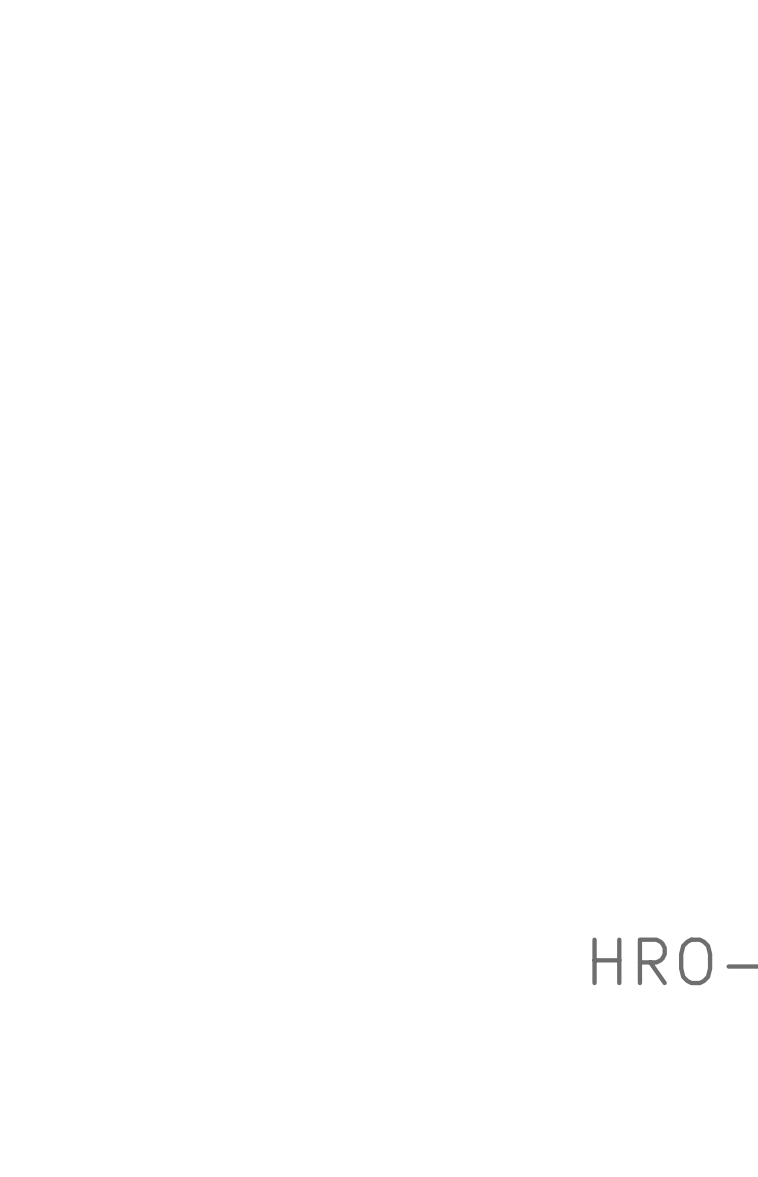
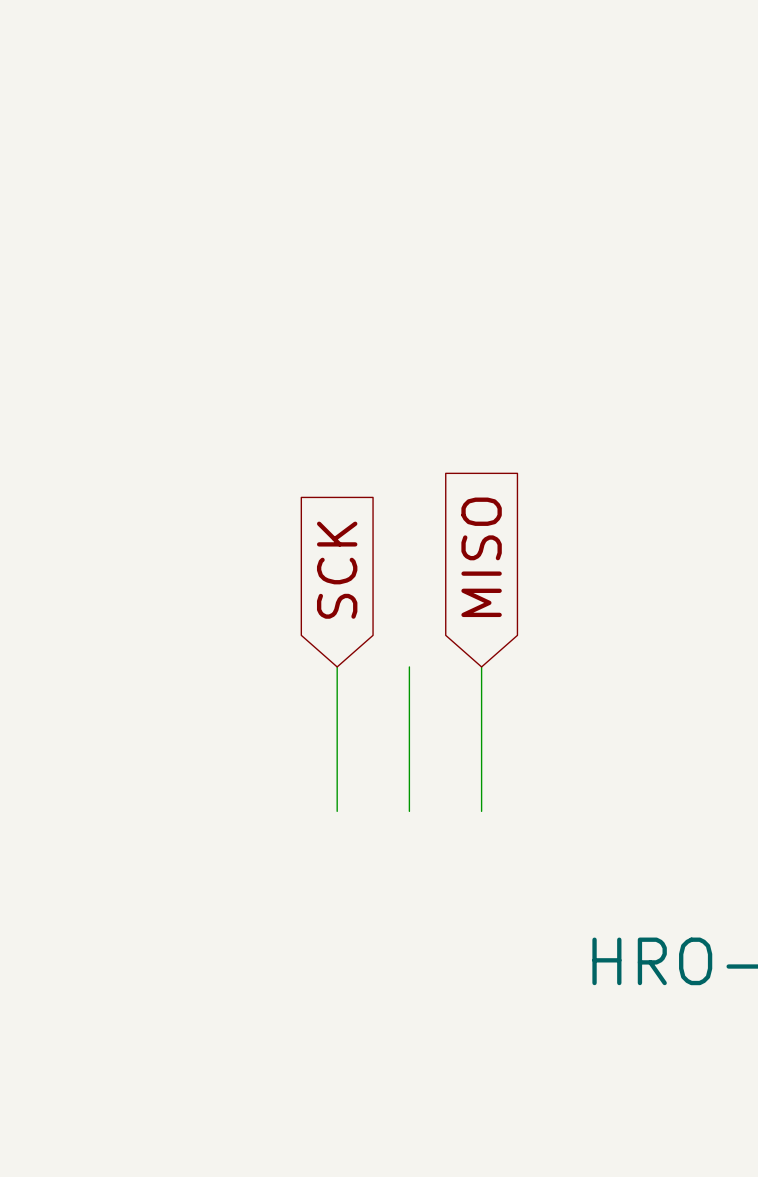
global label: none -> MISO (481, 557)
global label: none -> SCK (337, 570)
wire: none -> (337, 666) (337, 811)
wire: none -> (409, 666) (409, 811)
wire: none -> (481, 666) (481, 811)

